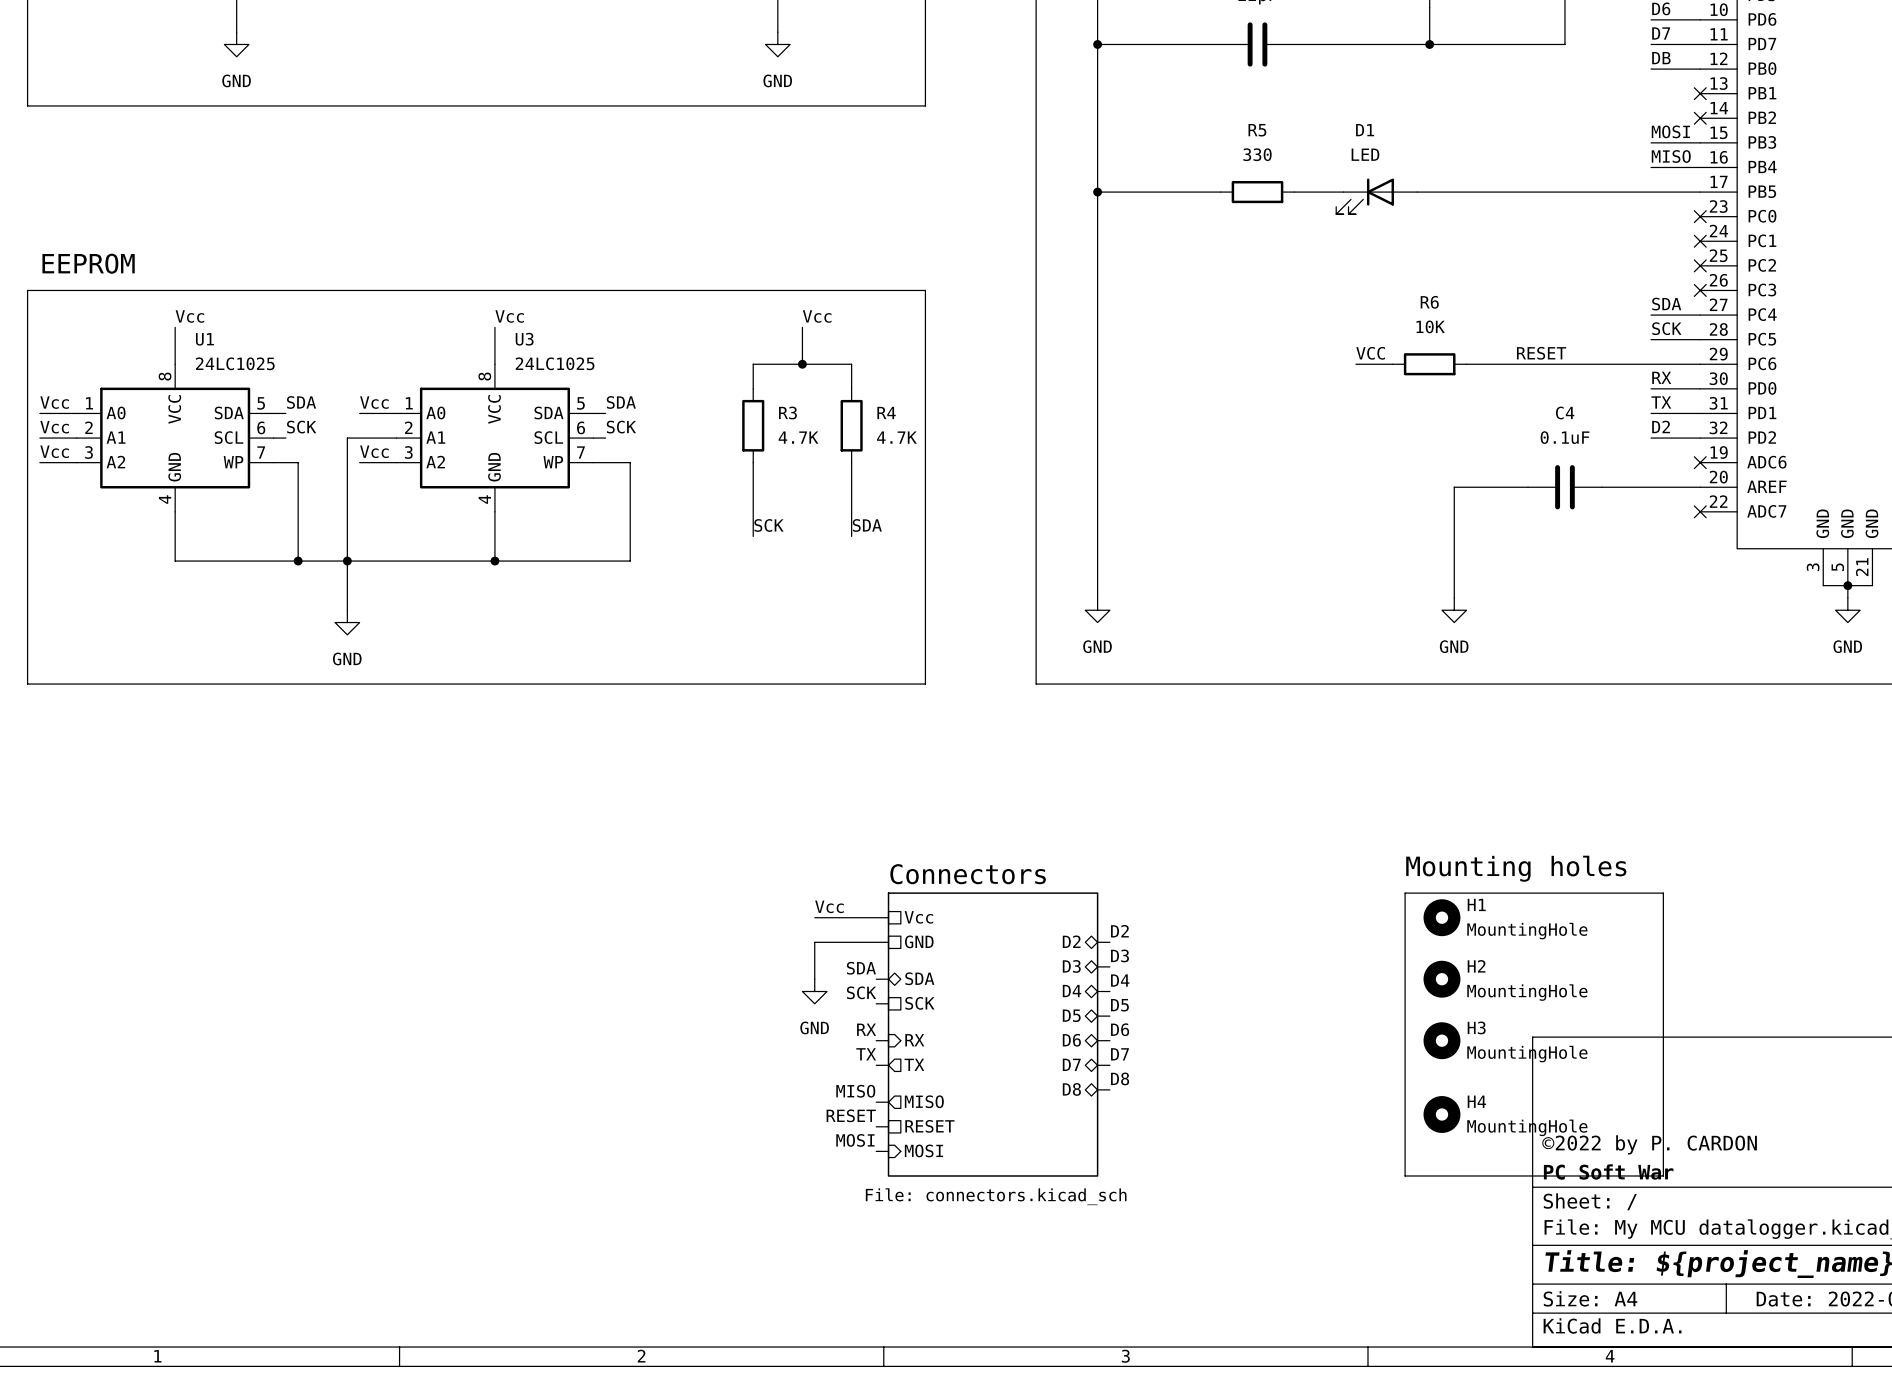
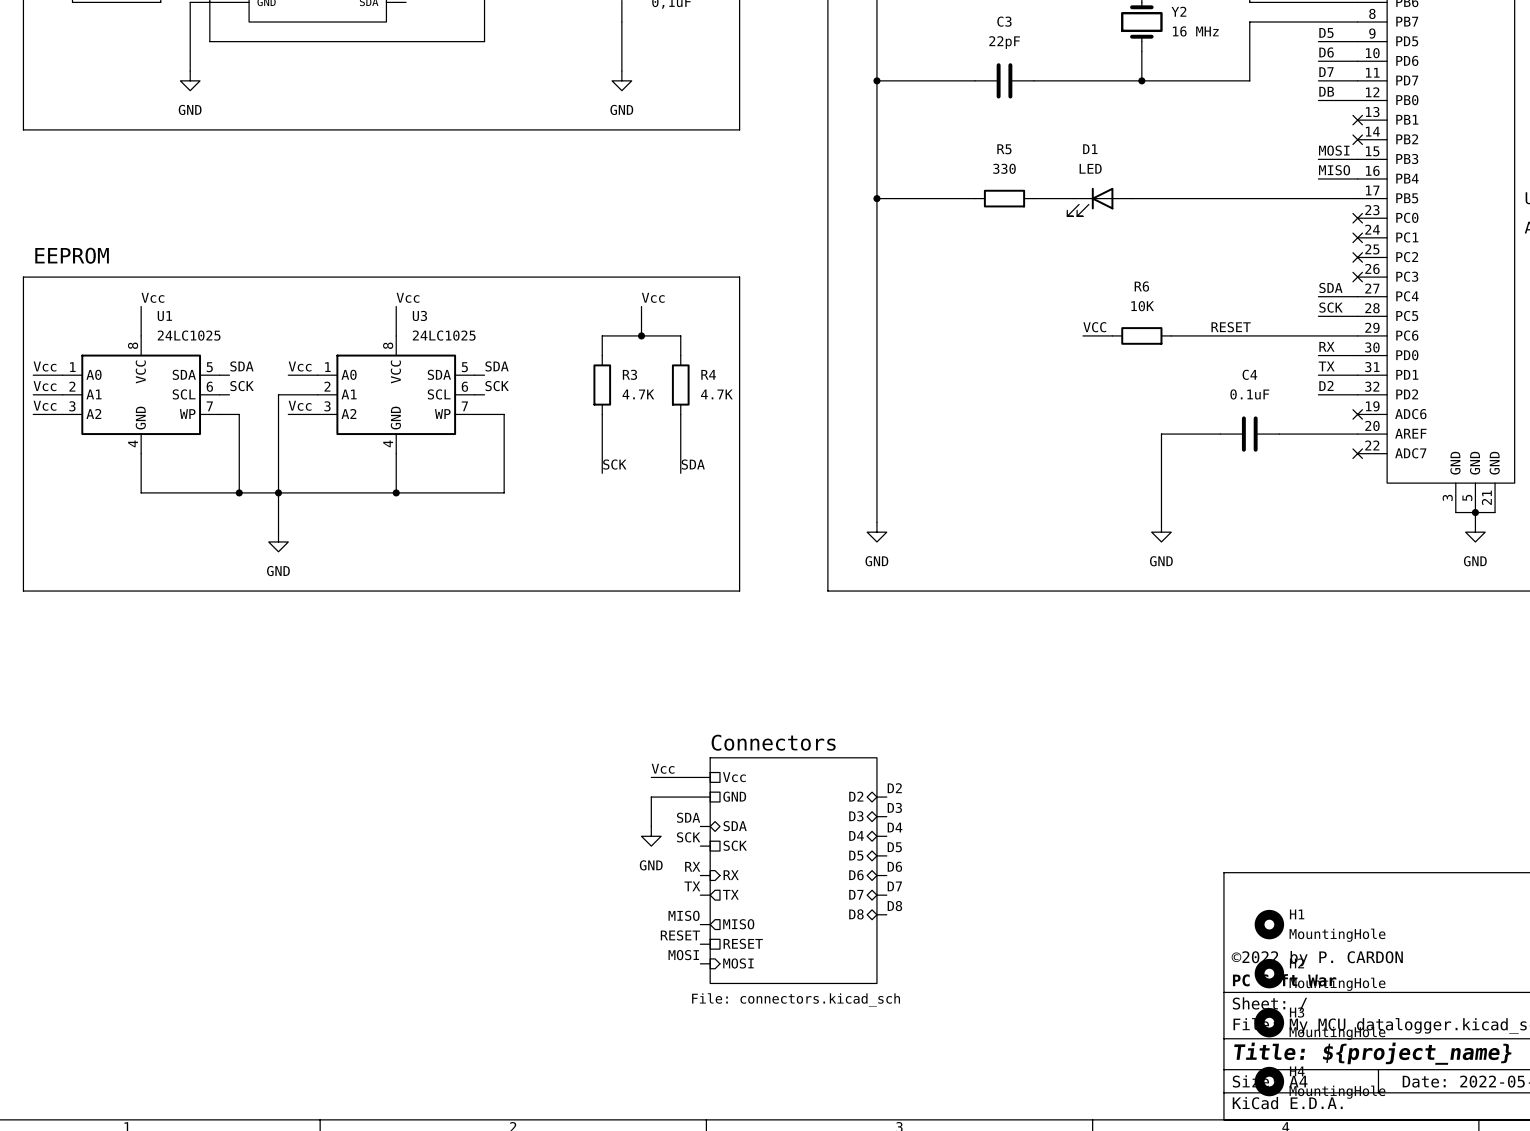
text: Mounting holes (1516, 868) -> none
line: (1405, 893) (1663, 893) (1663, 1175) (1405, 1175) (1405, 893) -> none
H1 position: (1441, 917) -> (1269, 924)
H2 position: (1441, 979) -> (1269, 973)
H3 position: (1441, 1040) -> (1269, 1022)
H4 position: (1441, 1114) -> (1269, 1081)

